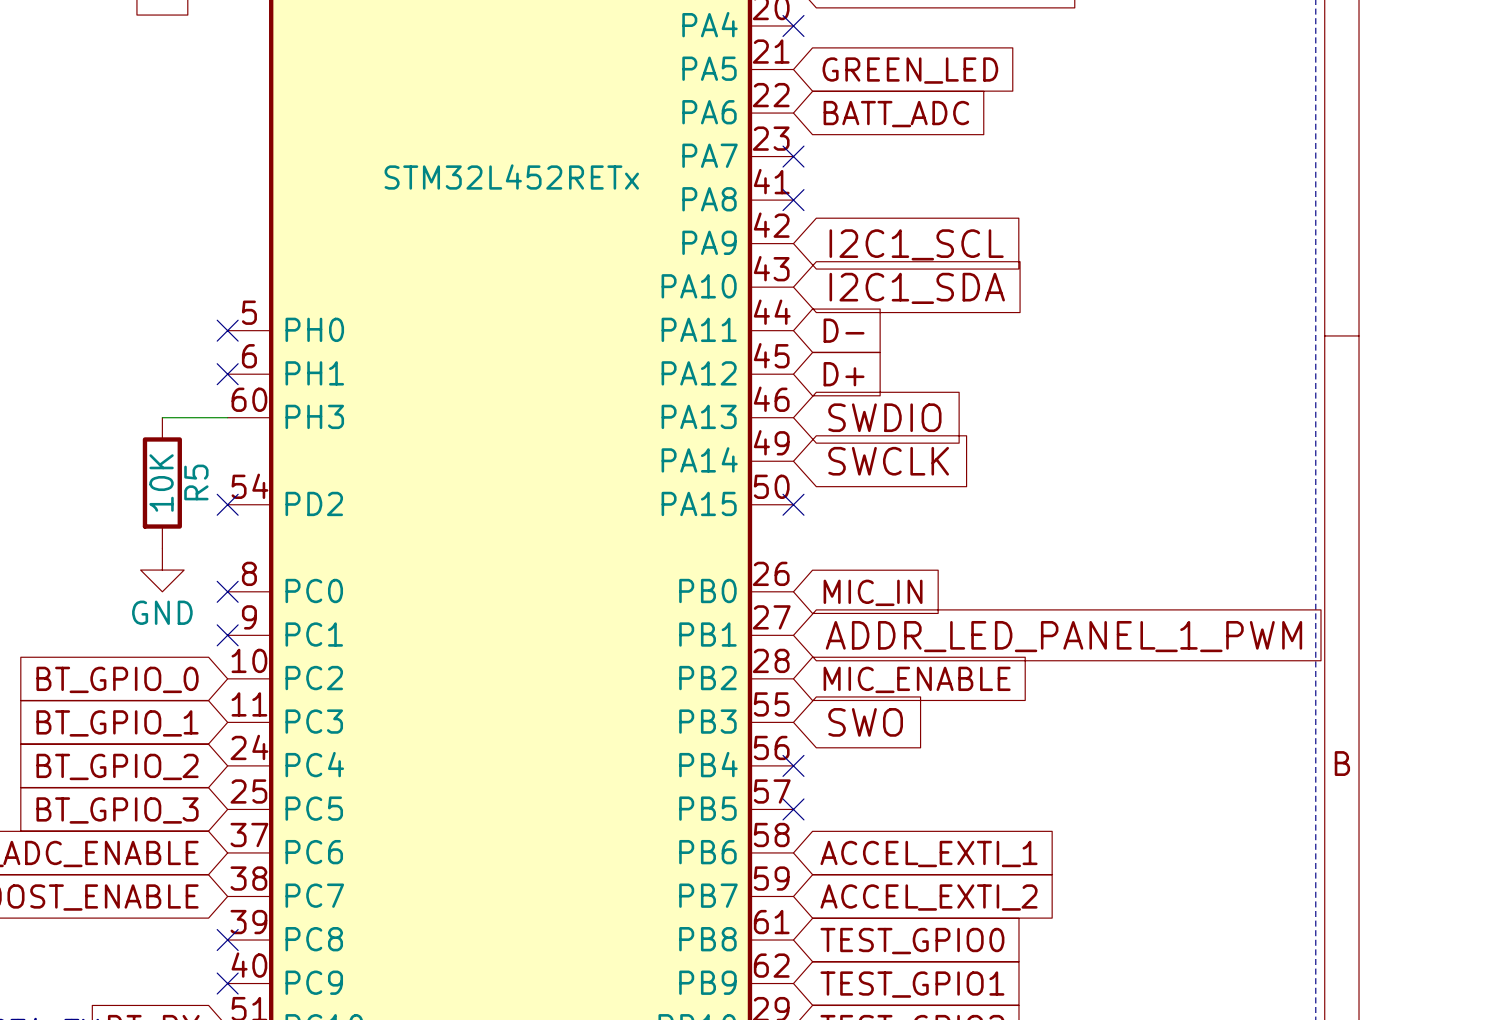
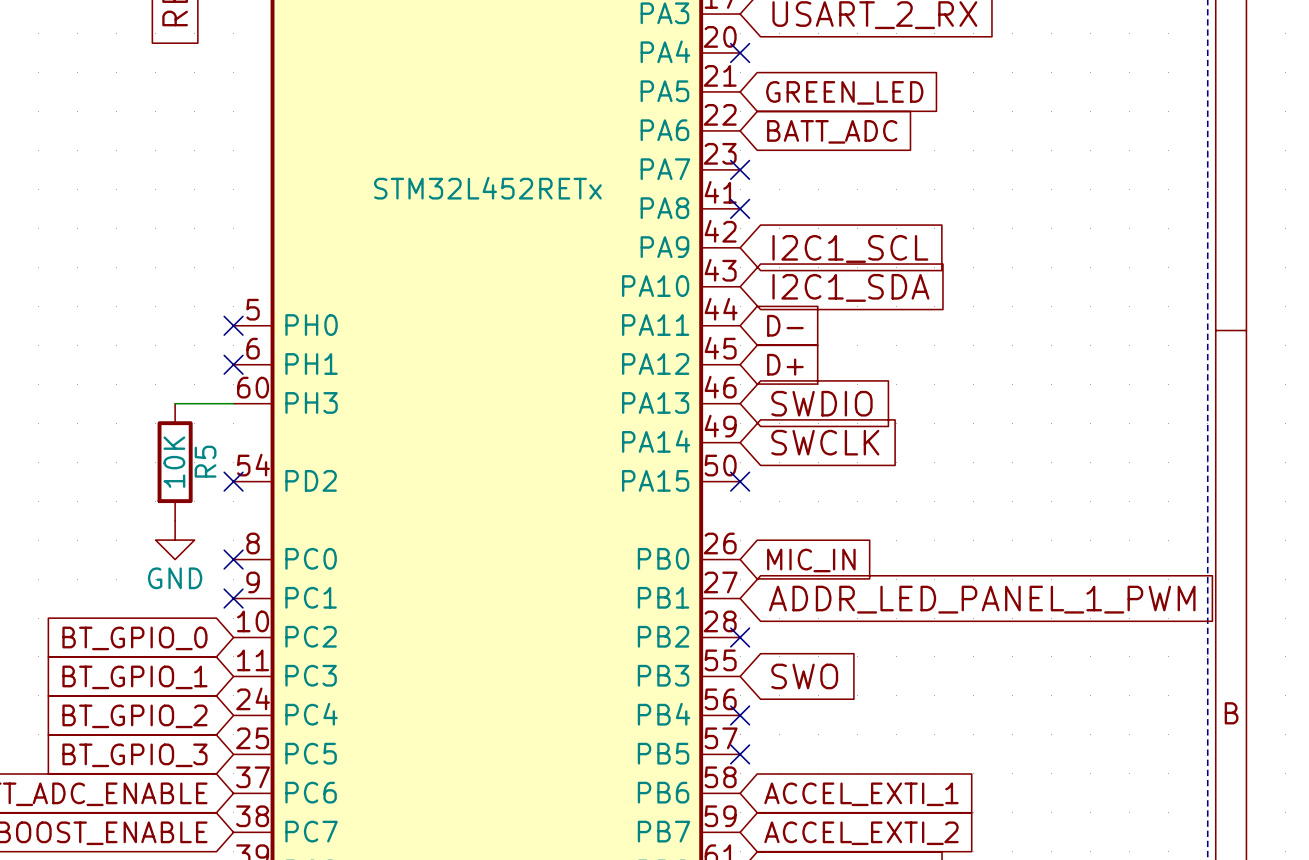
no-connect mark: none -> (740, 637)
global label: MIC_ENABLE (917, 679) -> none

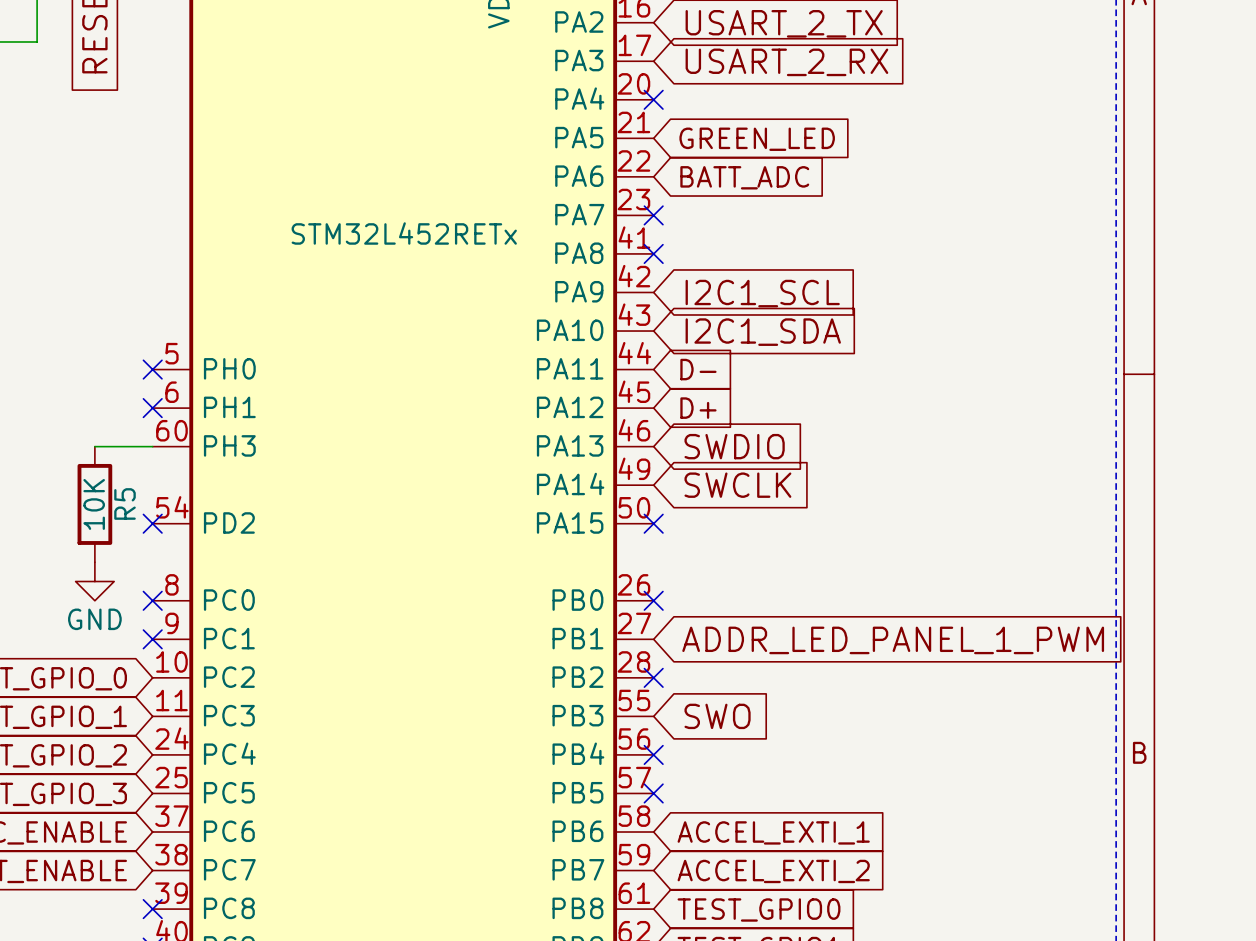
no-connect mark: none -> (653, 600)
global label: MIC_IN (811, 560) -> none

